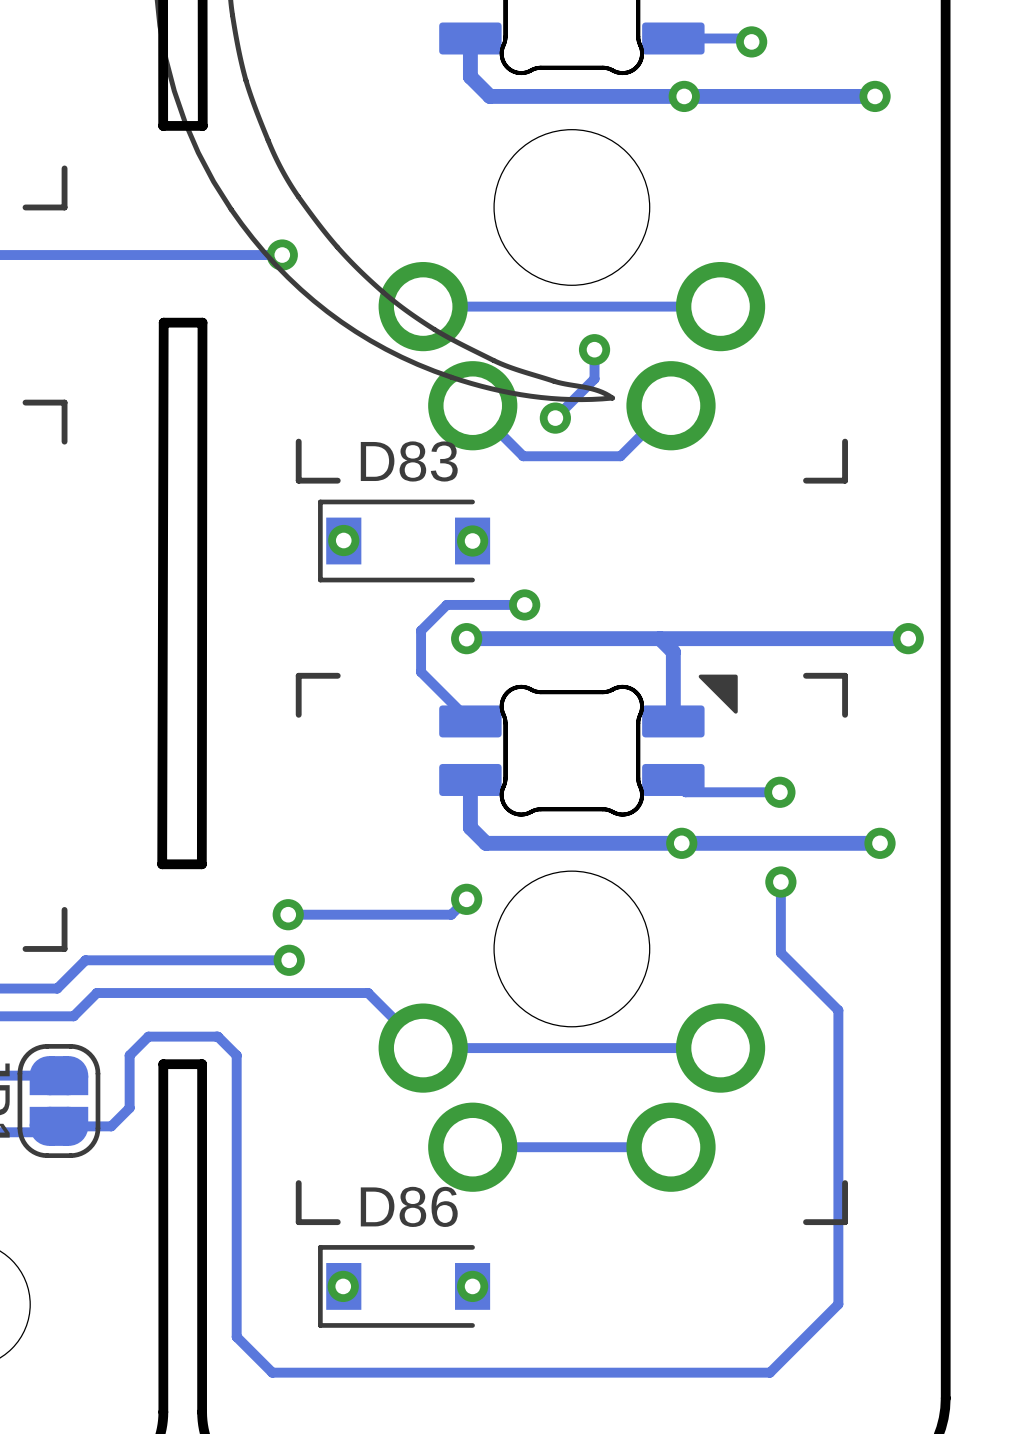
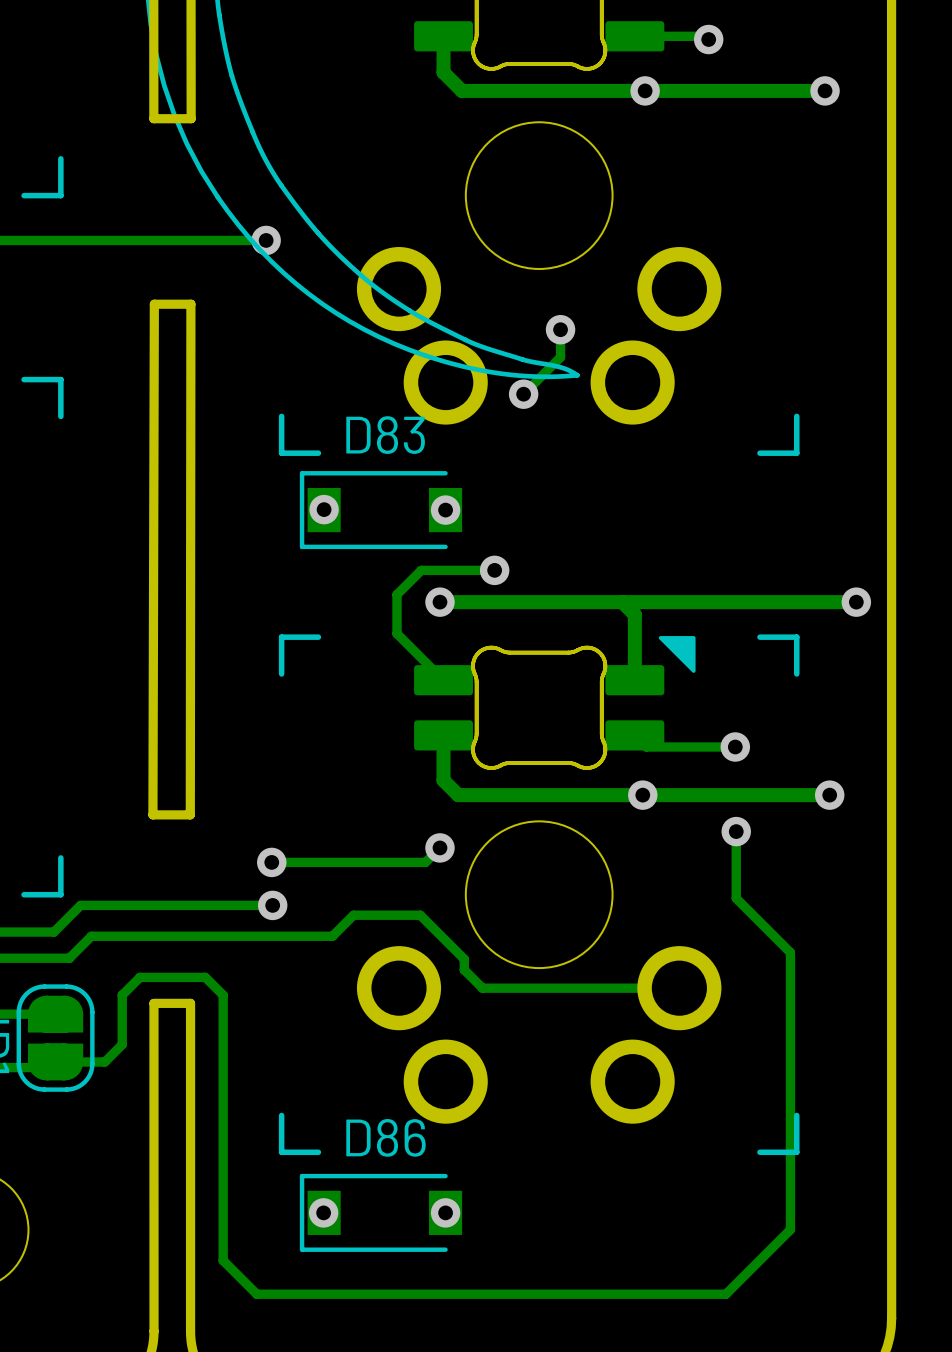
track: (720, 306) (423, 306) -> none
track: (671, 405) (620, 456) (523, 456) (472, 405) -> none
track: (352, 993) (368, 993) (423, 1048) (511, 1048) -> (332, 936) (353, 915) (420, 915) (464, 959) (464, 969) (482, 988)
track: (671, 1147) (472, 1147) -> none

